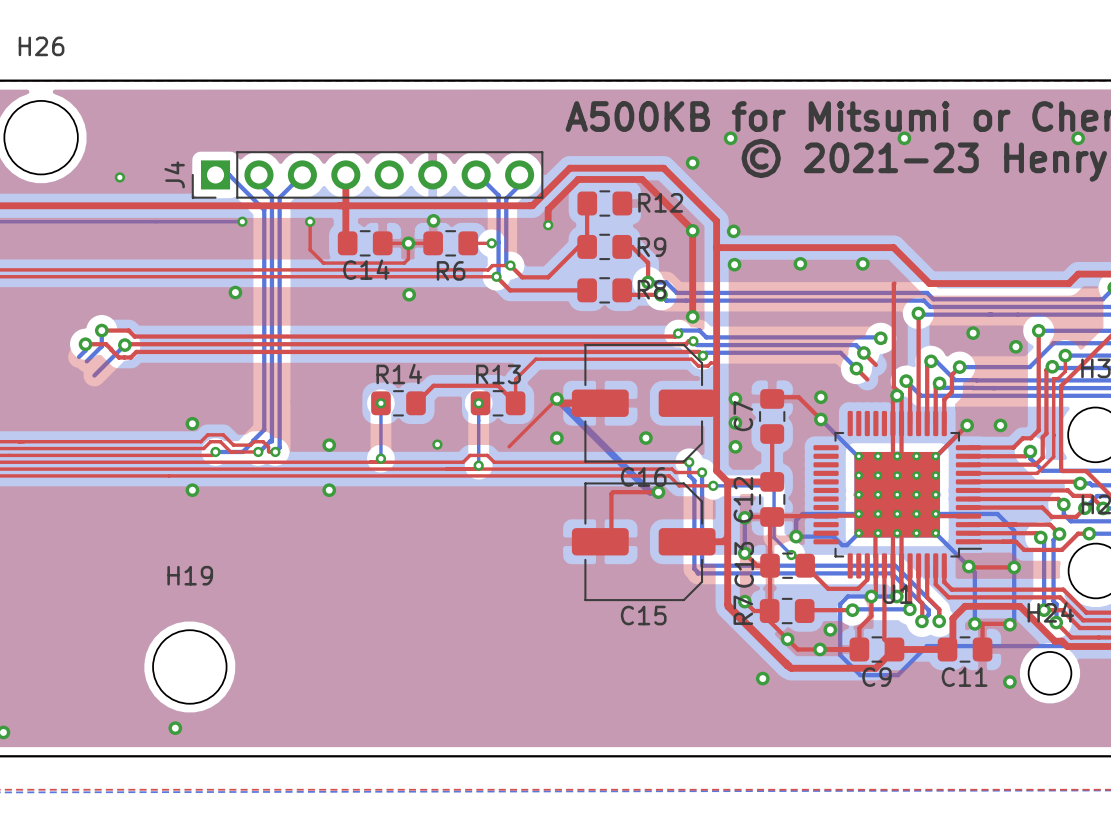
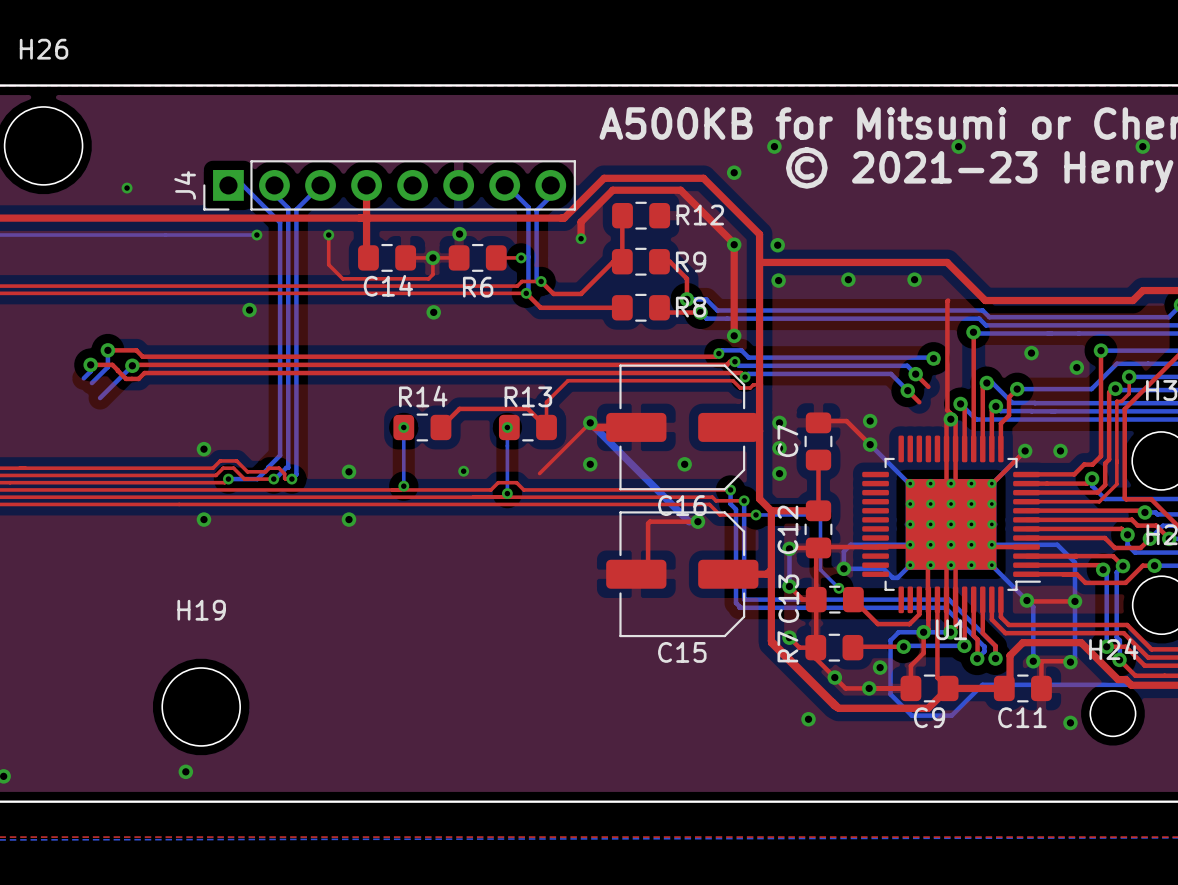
U1 footprint: [813, 410, 983, 579] -> [862, 435, 1041, 614]

